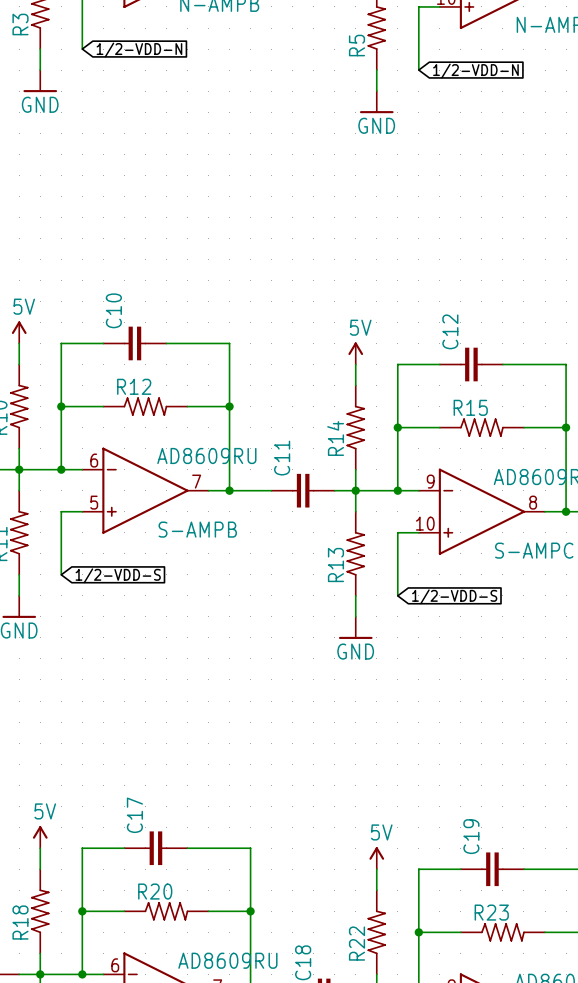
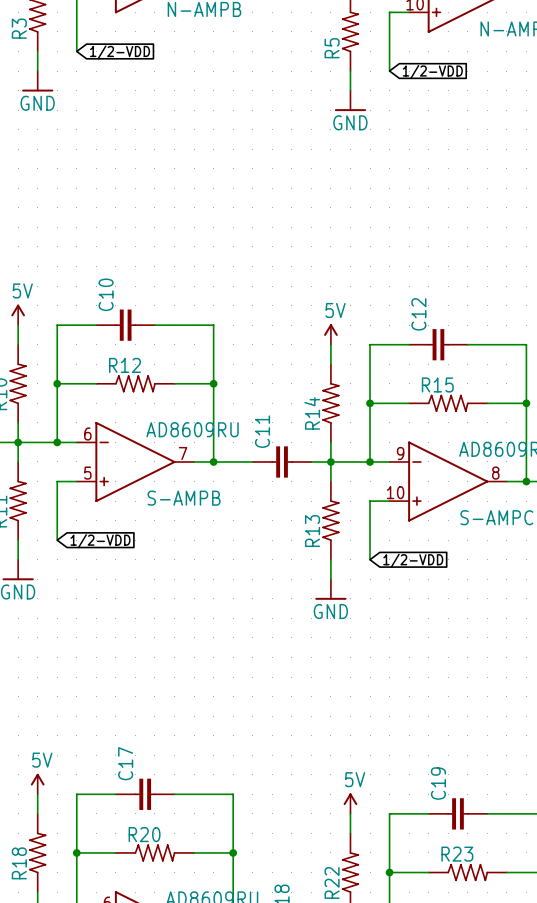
global label: 1/2-VDD-N (139, 50) -> 1/2-VDD (120, 52)
global label: 1/2-VDD-N (475, 71) -> 1/2-VDD (432, 71)
global label: 1/2-VDD-S (118, 575) -> 1/2-VDD (100, 541)
global label: 1/2-VDD-S (454, 596) -> 1/2-VDD (413, 560)

